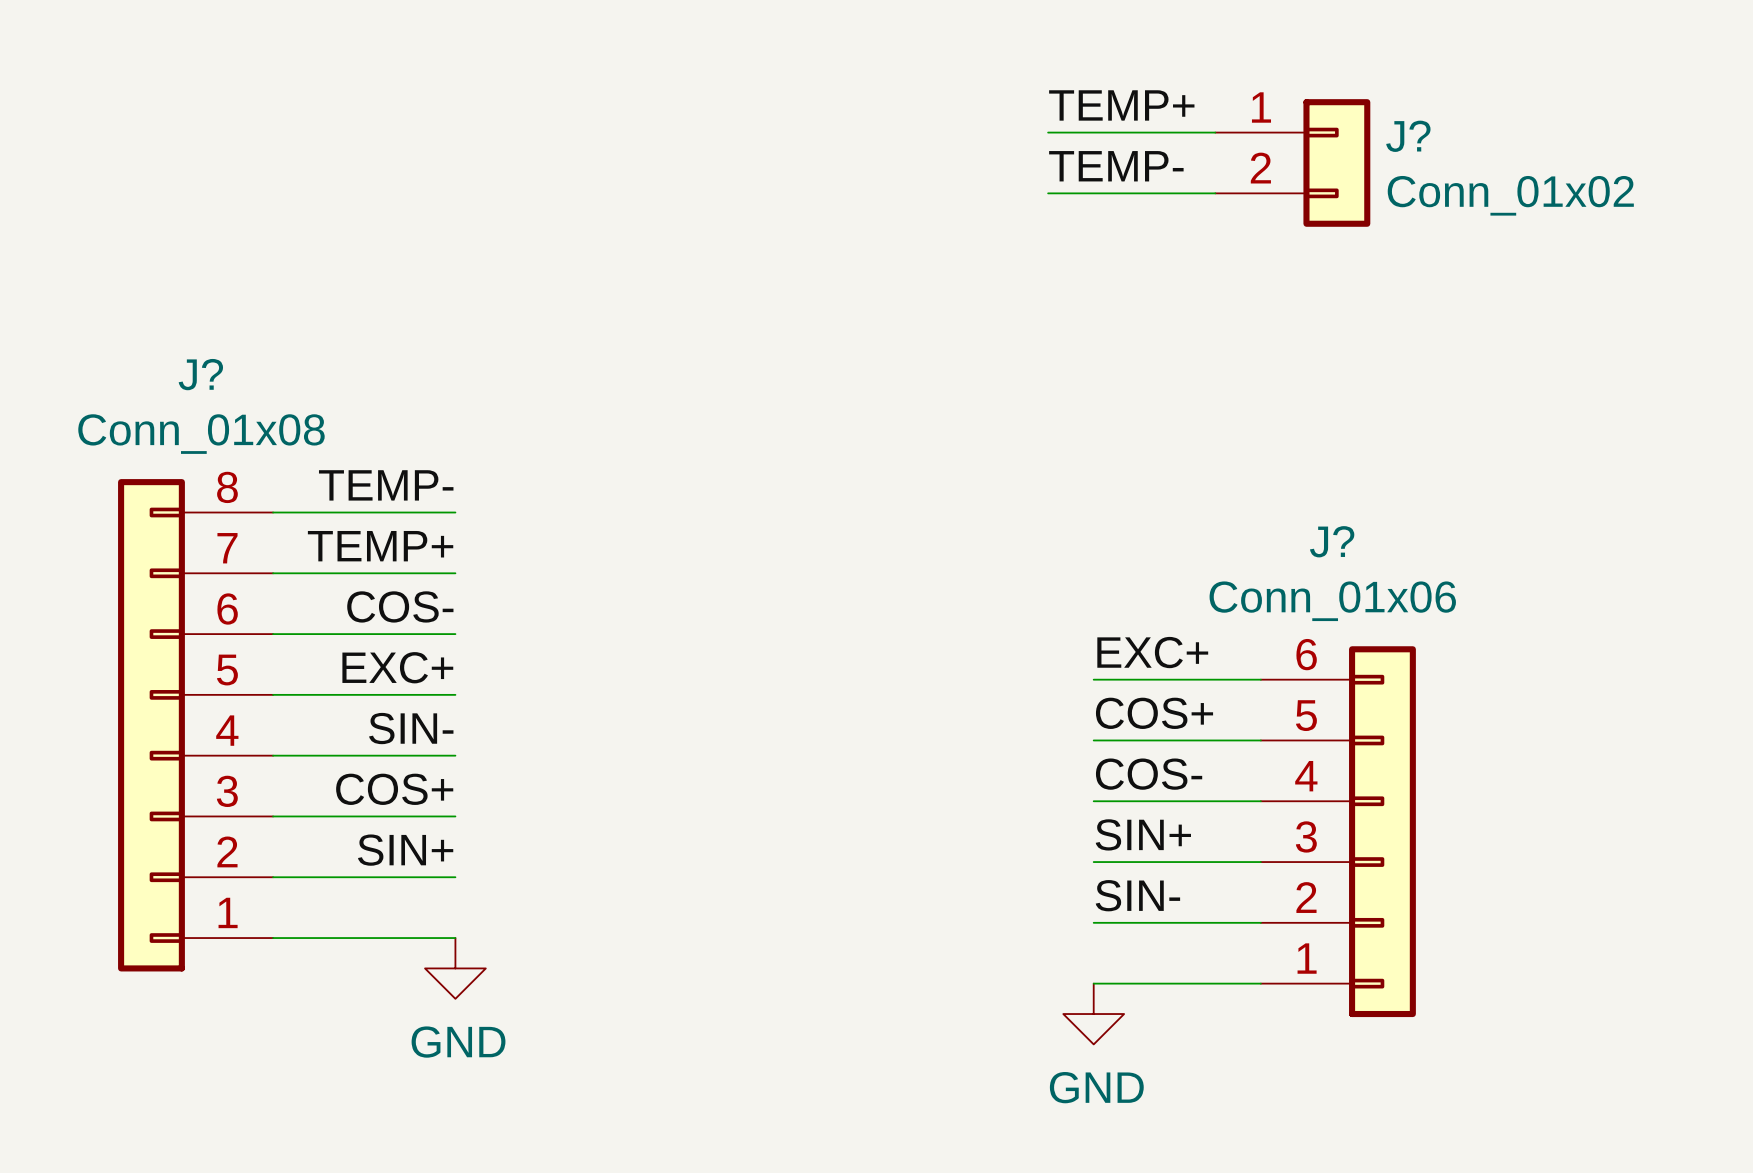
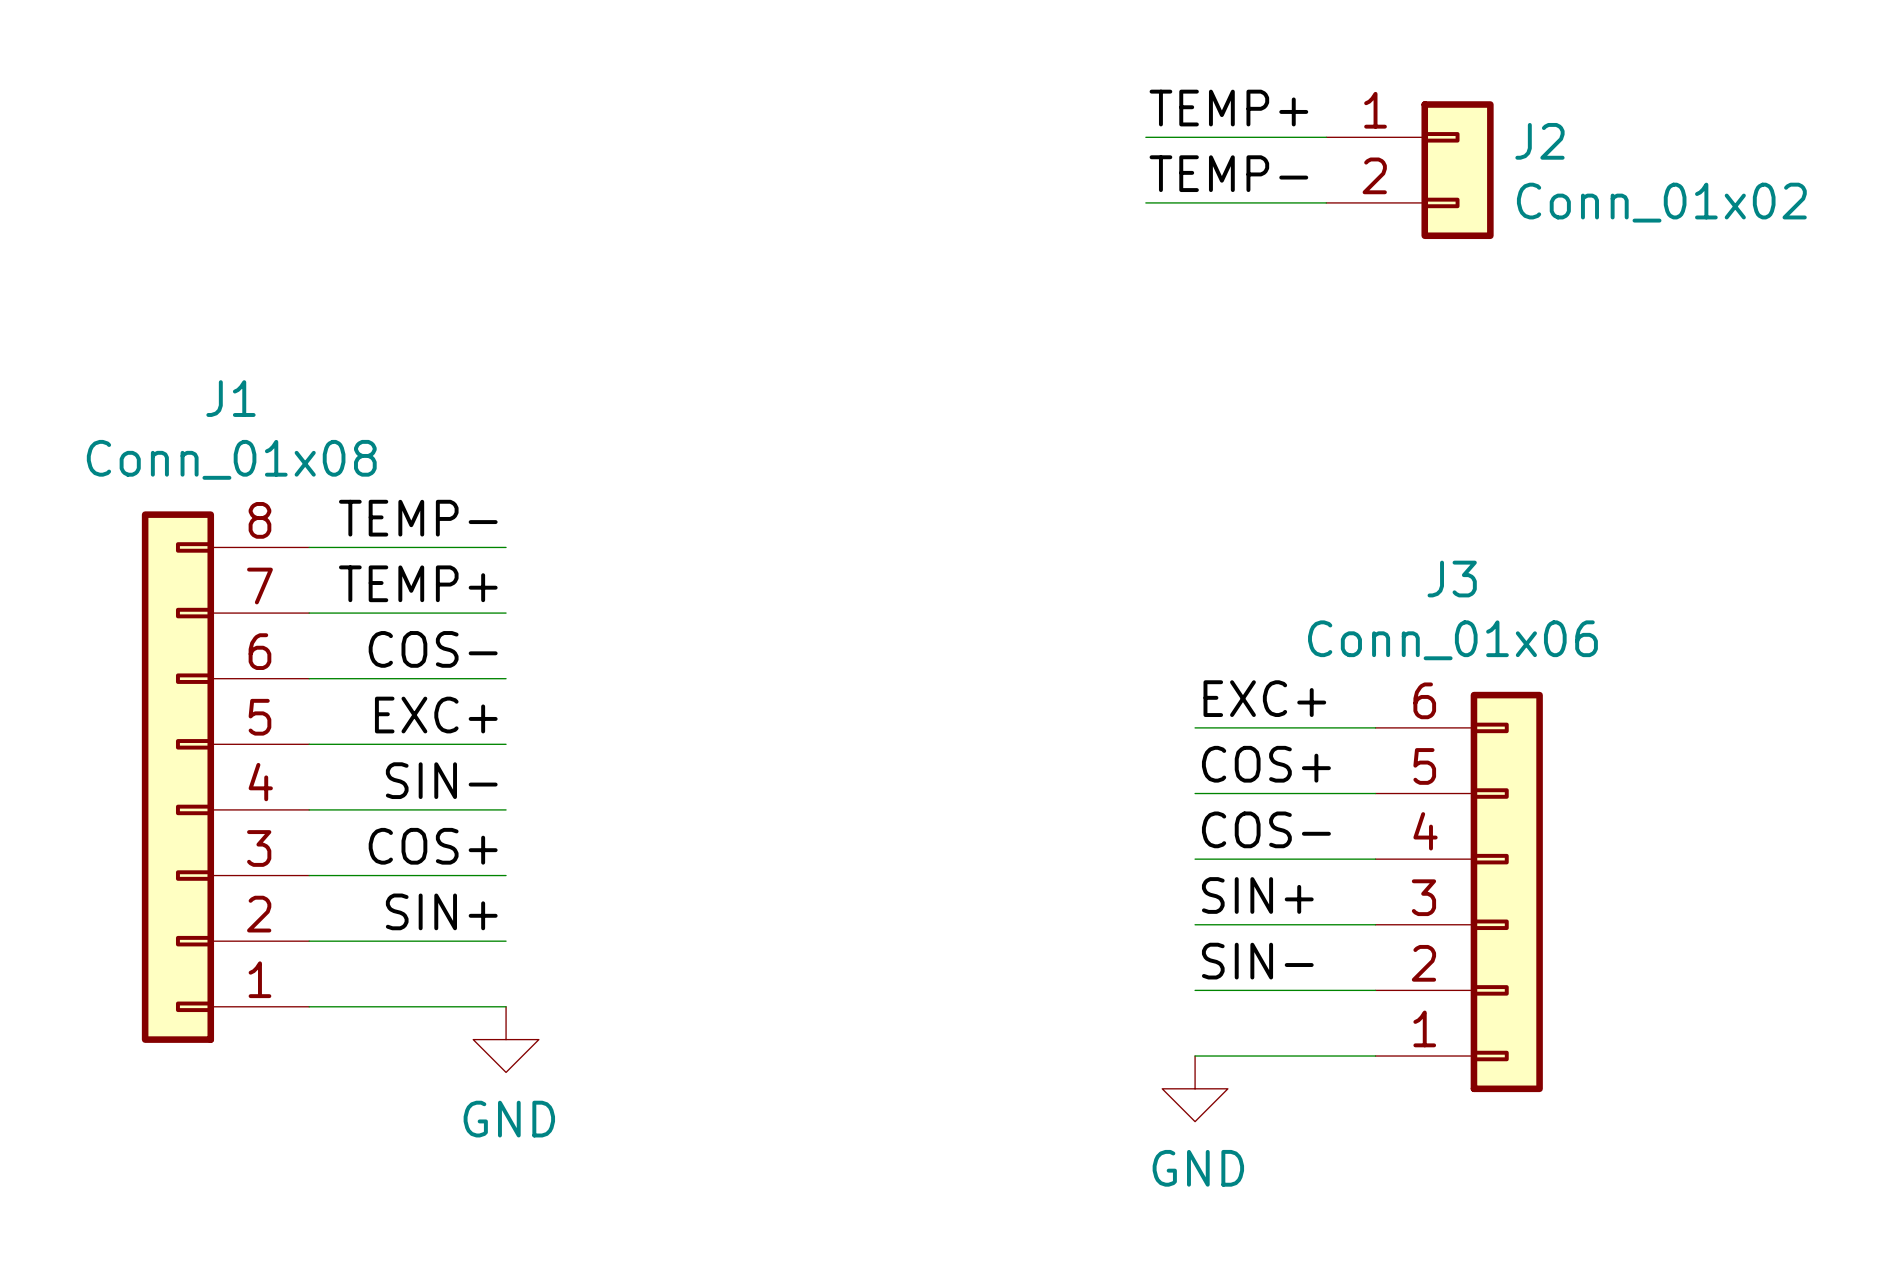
J? name: J? (1408, 136) -> J2 (1539, 141)
J? name: J? (200, 374) -> J1 (230, 398)
J? name: J? (1332, 541) -> J3 (1452, 579)

